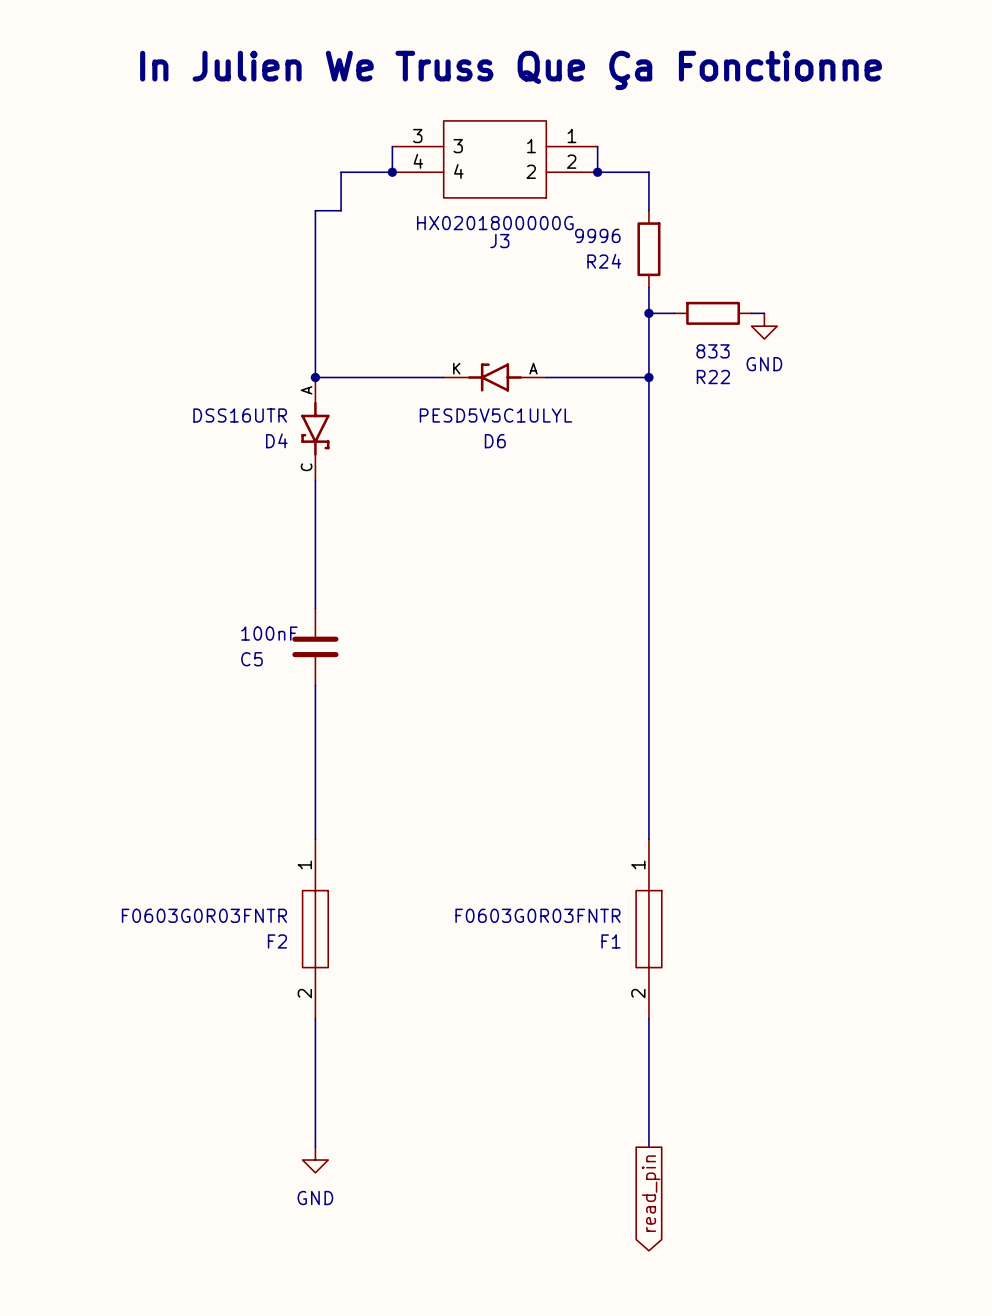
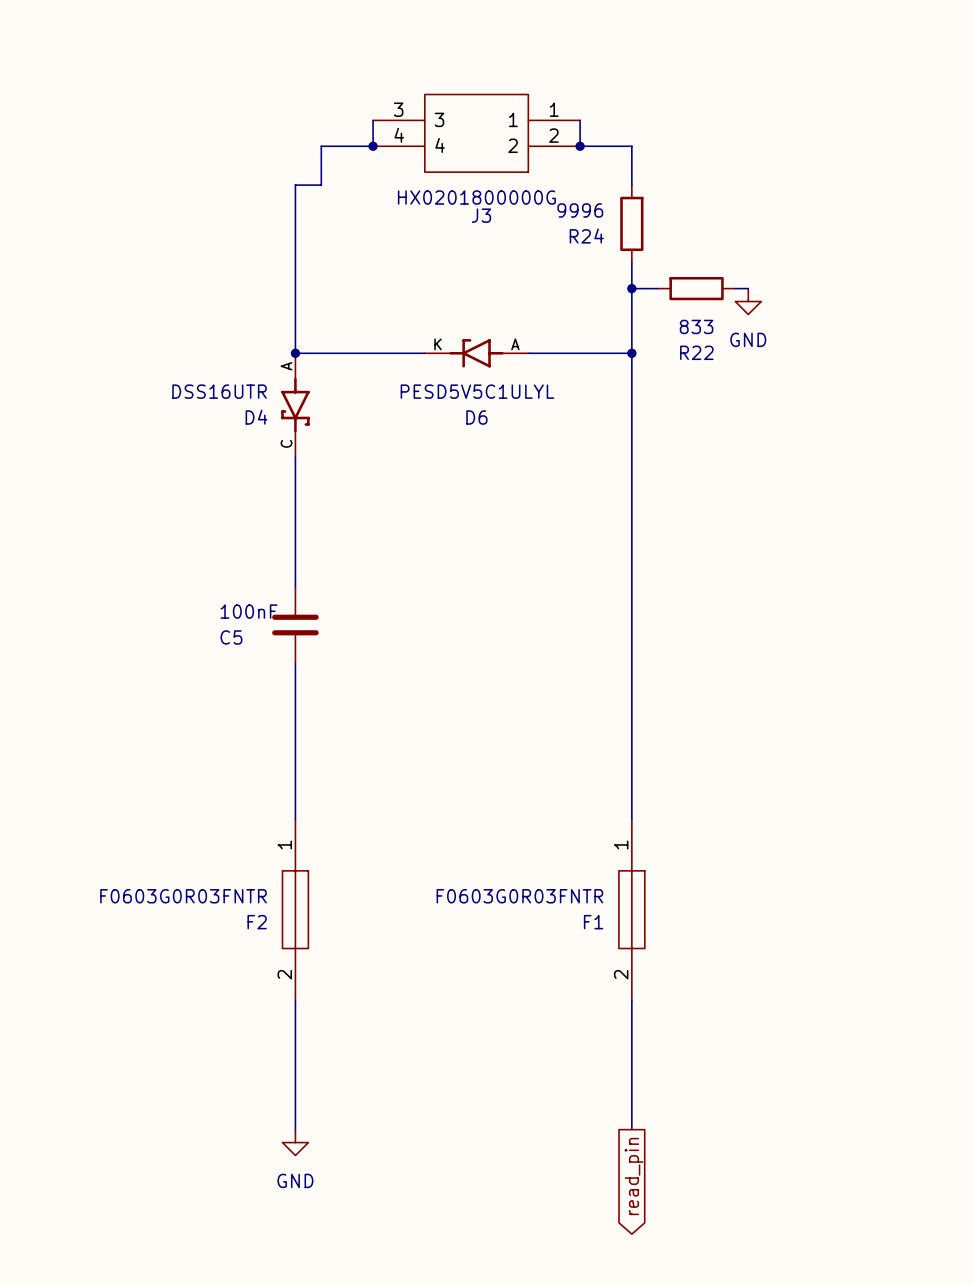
text: In Julien We Truss Que Ça Fonctionne (511, 70) -> none

